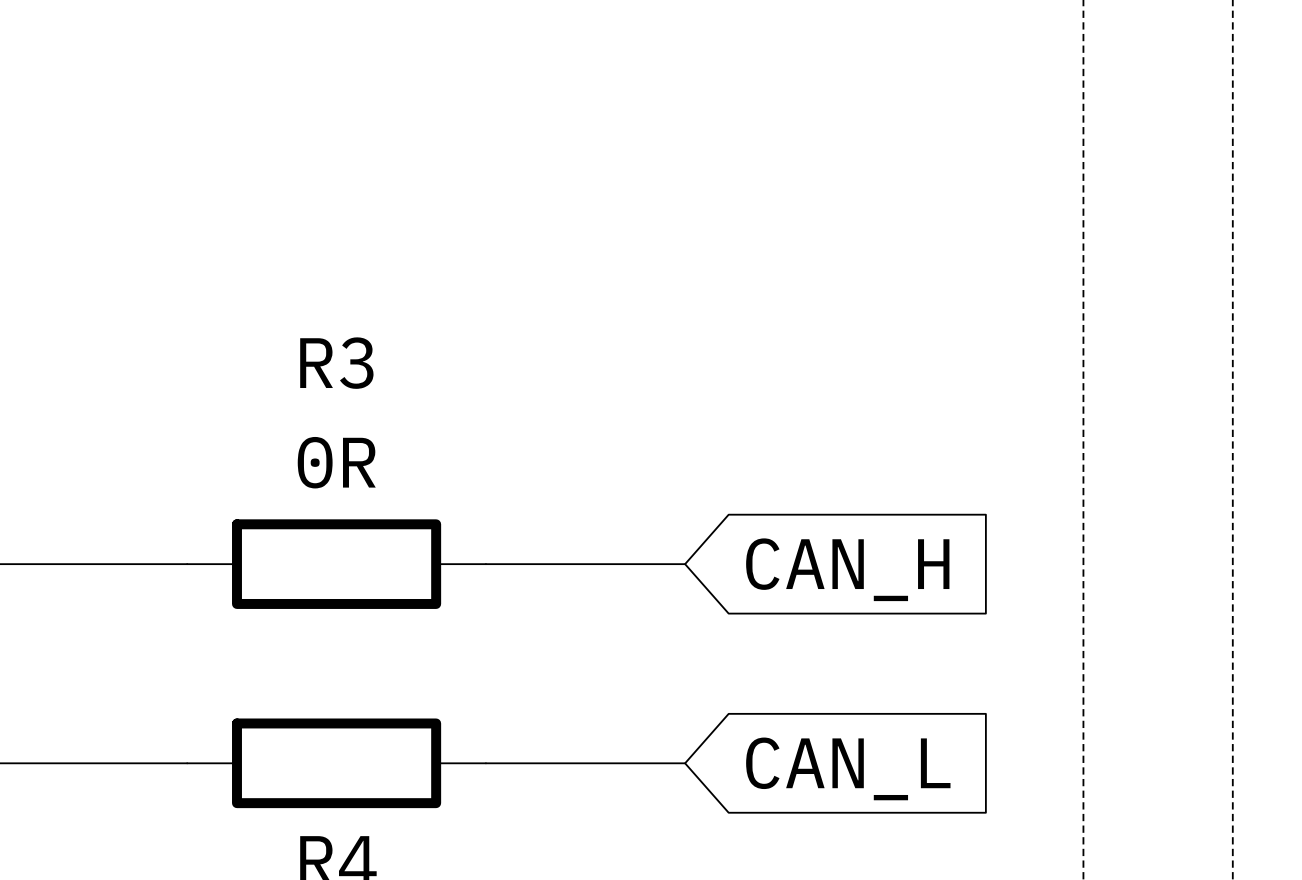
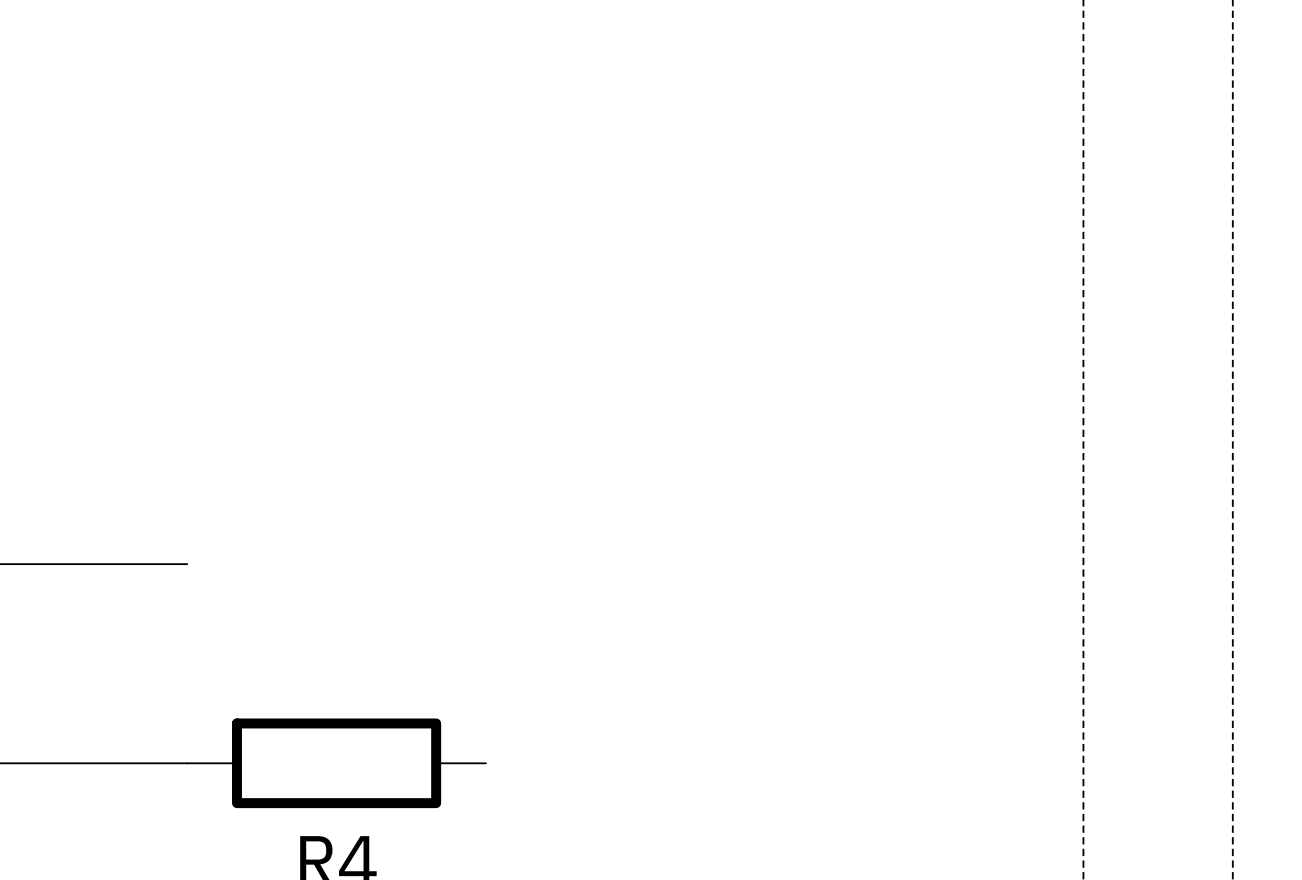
R3: 0R (336, 564) -> none
wire: (485, 564) (685, 564) -> none
global label: CAN_H (847, 569) -> none
wire: (485, 763) (685, 763) -> none
global label: CAN_L (848, 768) -> none

